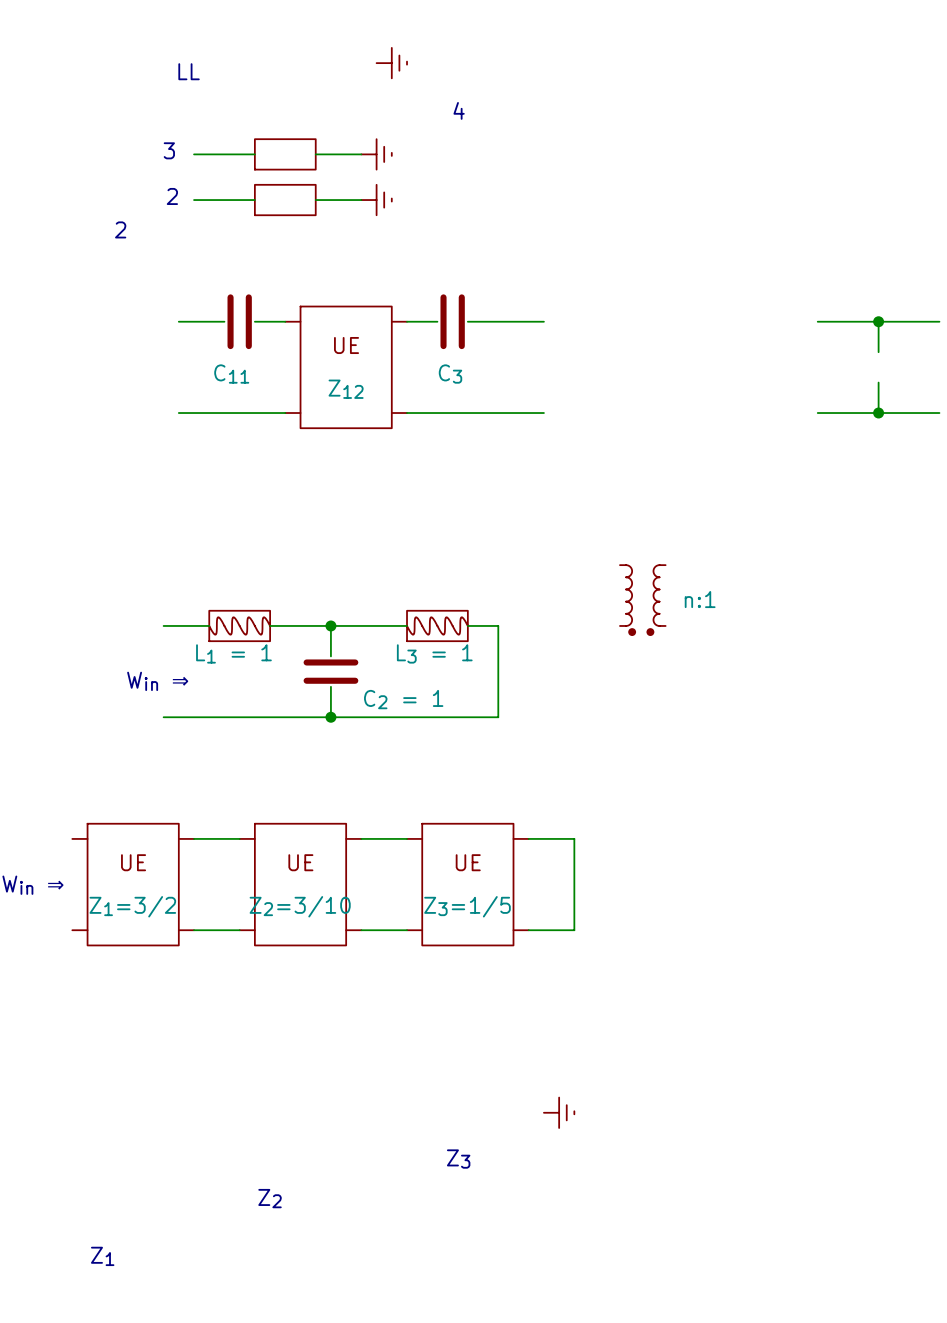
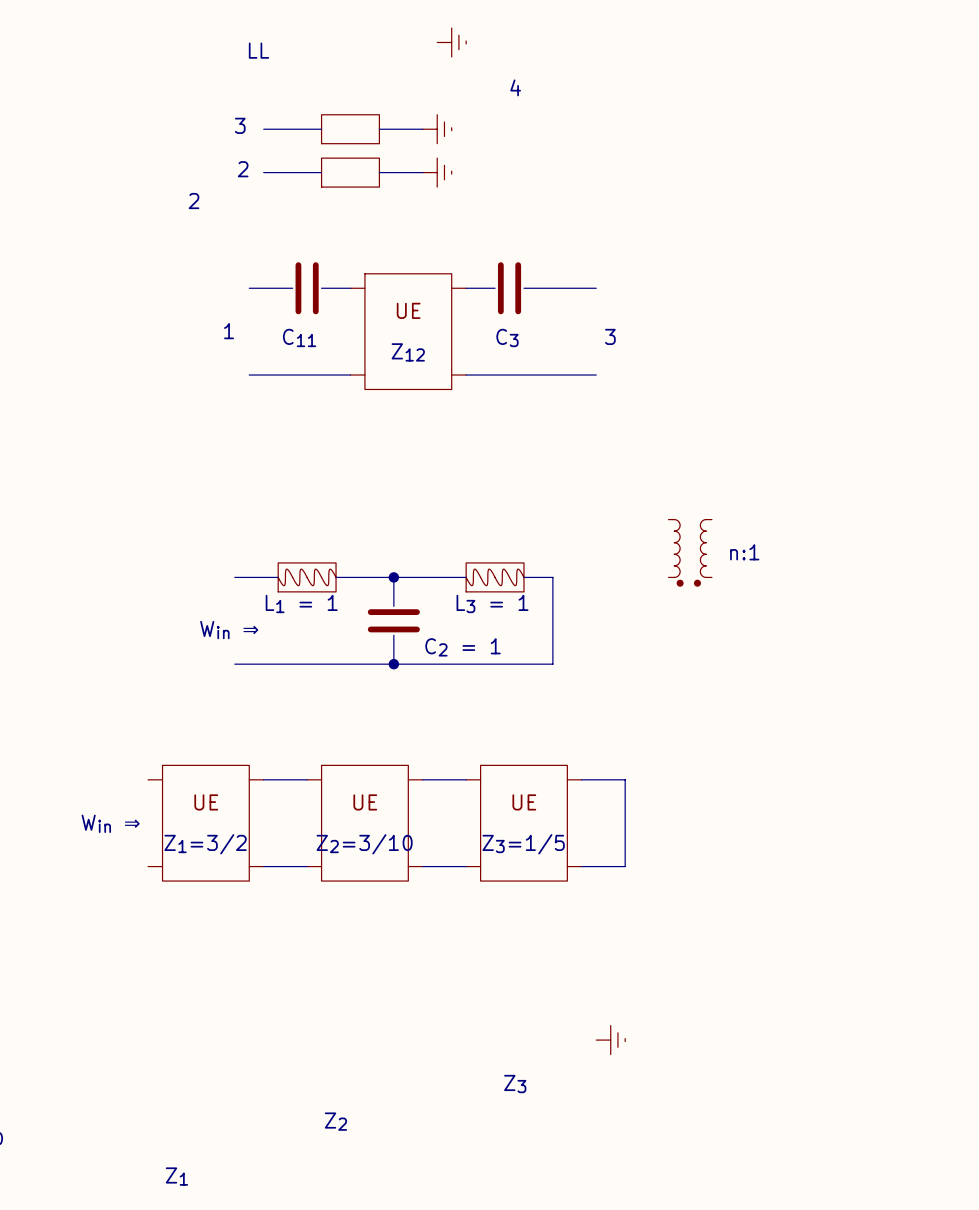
wire: (817, 321) (939, 321) -> none
wire: (878, 321) (878, 352) -> none
junction: (878, 321) -> none
text: none -> 1 (229, 331)
text: none -> 3 (610, 336)
wire: (878, 382) (878, 413) -> none
wire: (817, 413) (939, 413) -> none
junction: (878, 413) -> none

